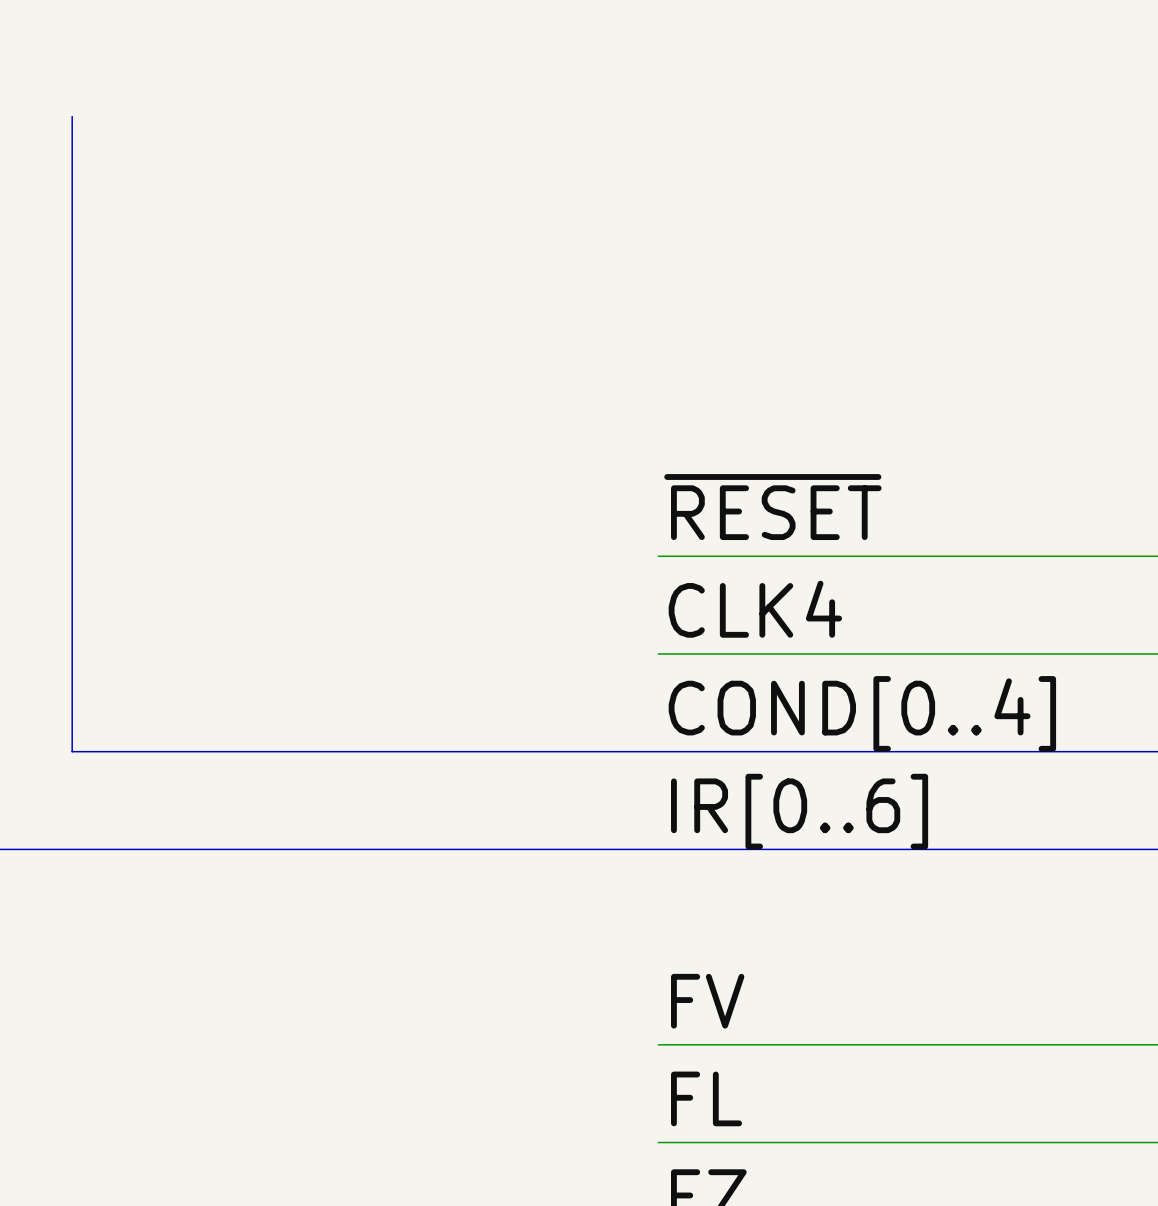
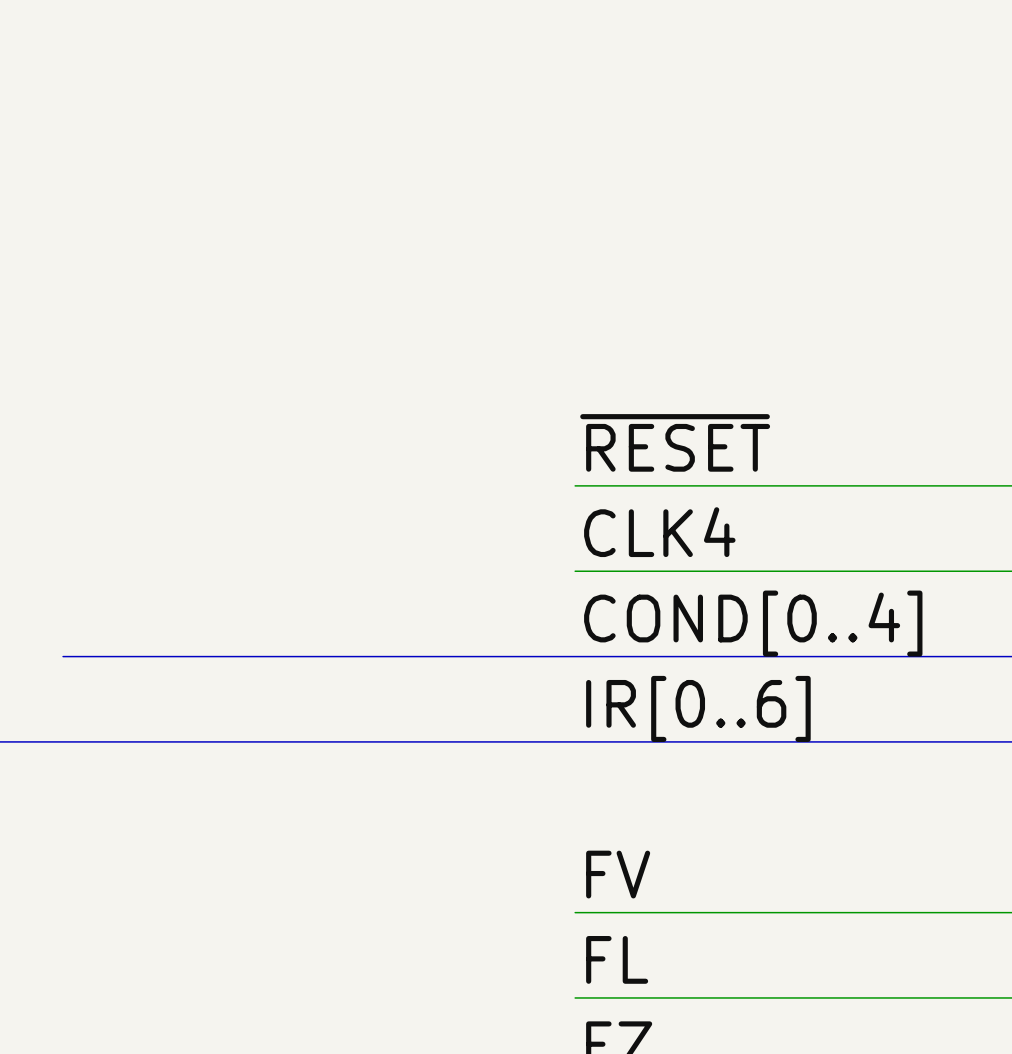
bus: (72, 116) (72, 751) -> none

